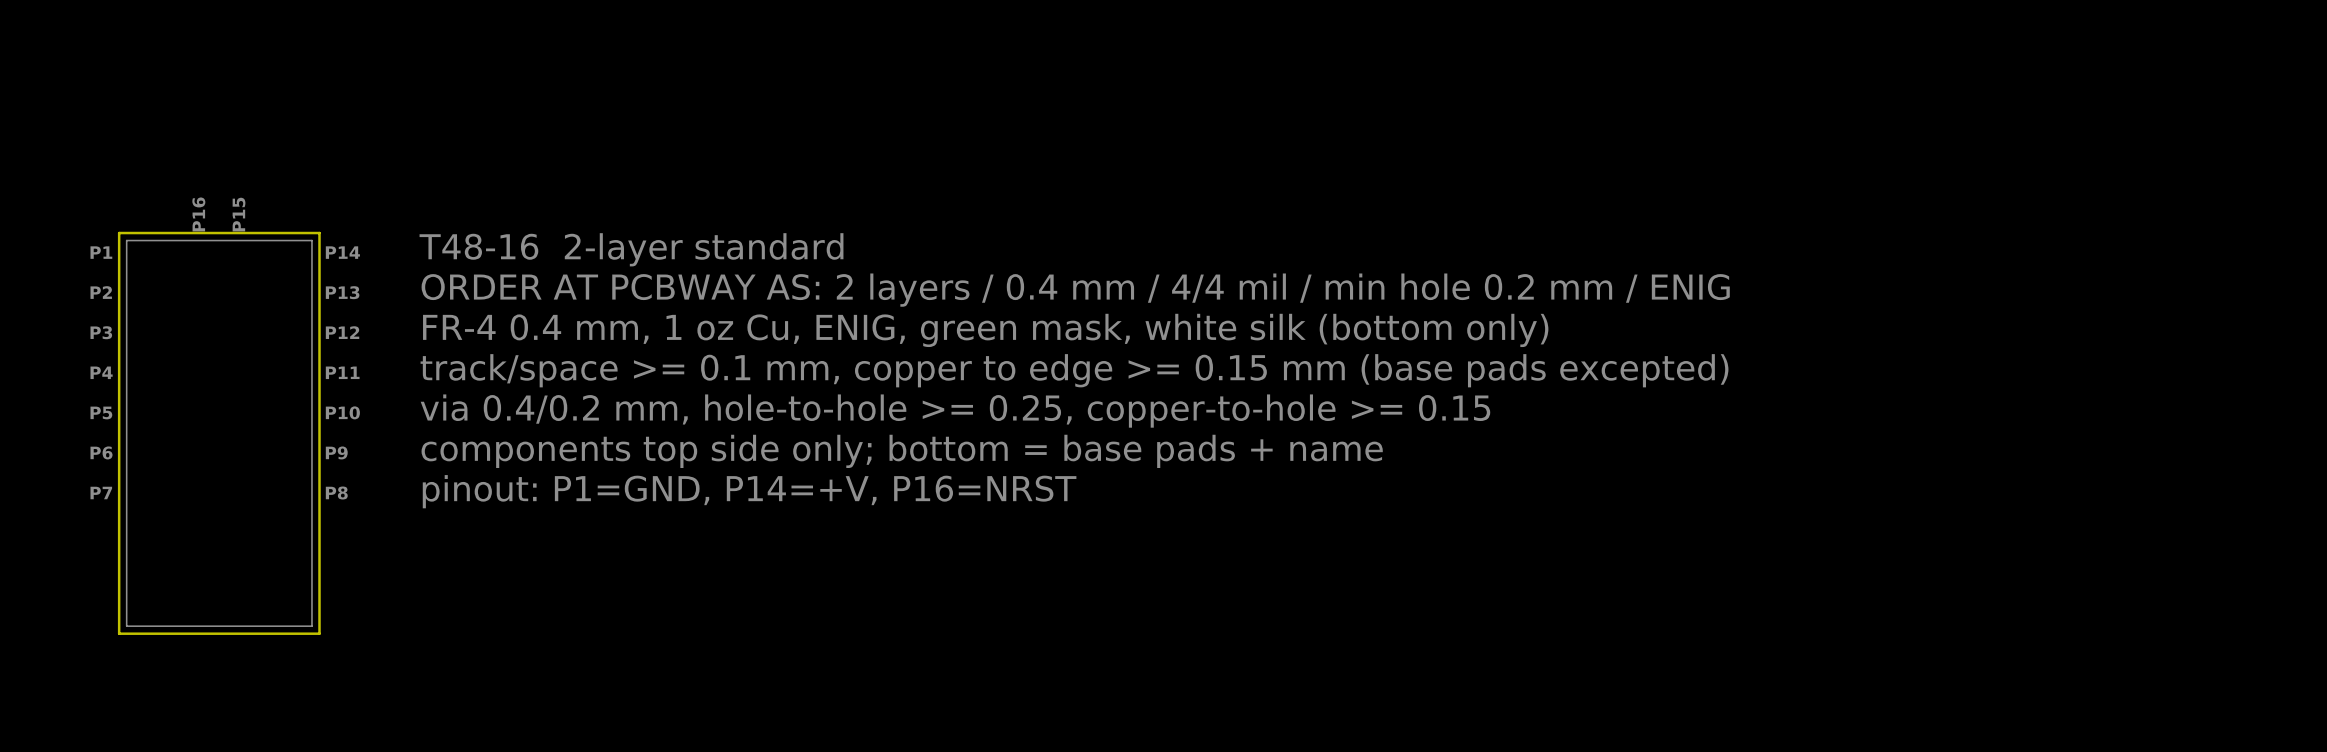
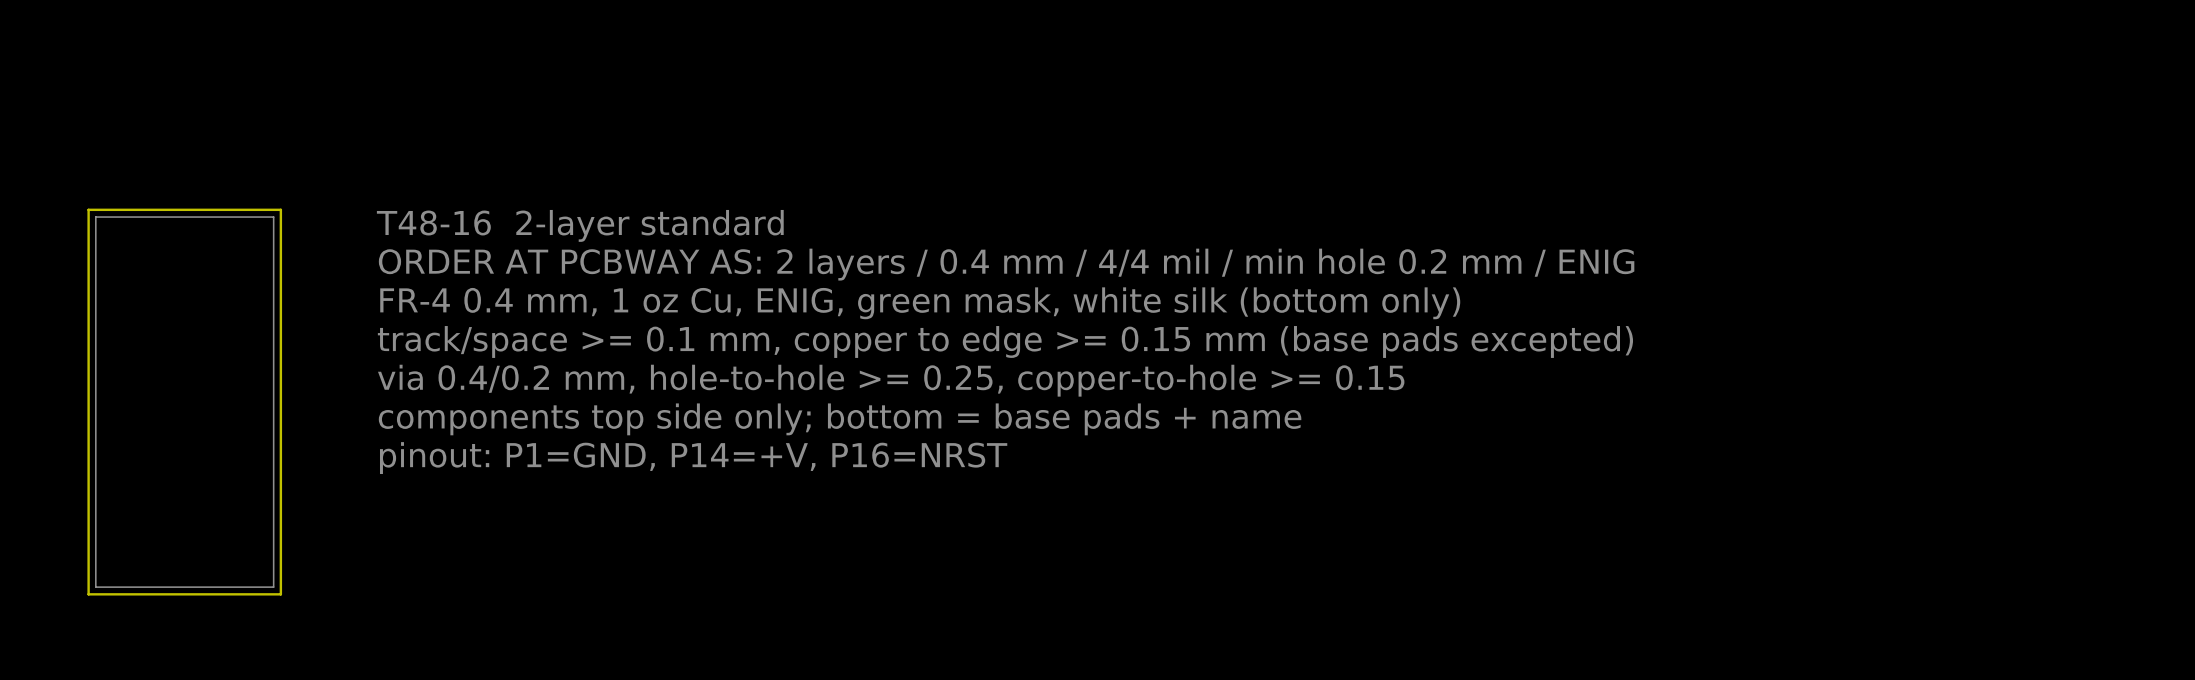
text: P16 (198, 214) -> none
text: P15 (239, 214) -> none
text: P1 (101, 252) -> none
text: P14 (342, 252) -> none
text: P2 (101, 292) -> none
text: P13 (342, 292) -> none
text: P3 (101, 332) -> none
text: P12 (342, 332) -> none
text: P4 (101, 372) -> none
text: P11 (342, 372) -> none
text: P5 (101, 412) -> none
text: P10 (342, 412) -> none
text: P6 (101, 452) -> none
text: P9 (336, 452) -> none
text: P7 (101, 492) -> none
text: P8 (336, 493) -> none

